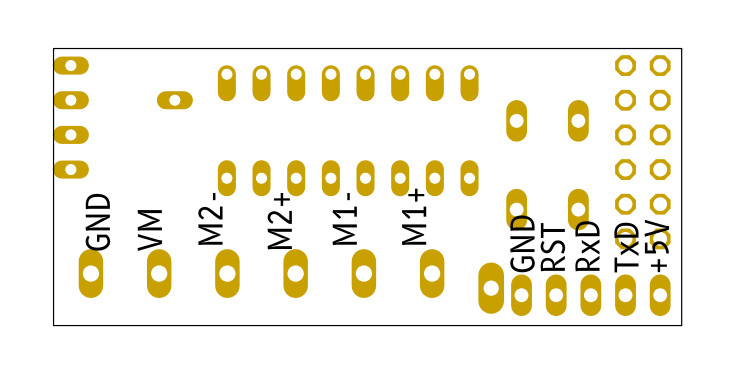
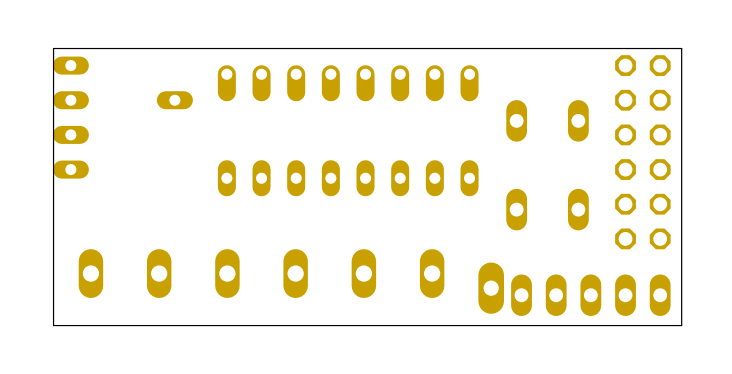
text: M1+ (414, 216) -> none
text: M2- (210, 219) -> none
text: M1- (344, 219) -> none
text: M2+ (279, 221) -> none
text: GND (97, 222) -> none
text: VM (149, 230) -> none
text: GND (522, 243) -> none
text: +5V (656, 245) -> none
text: RxD (587, 246) -> none
text: RST (552, 247) -> none
text: TxD (626, 247) -> none

